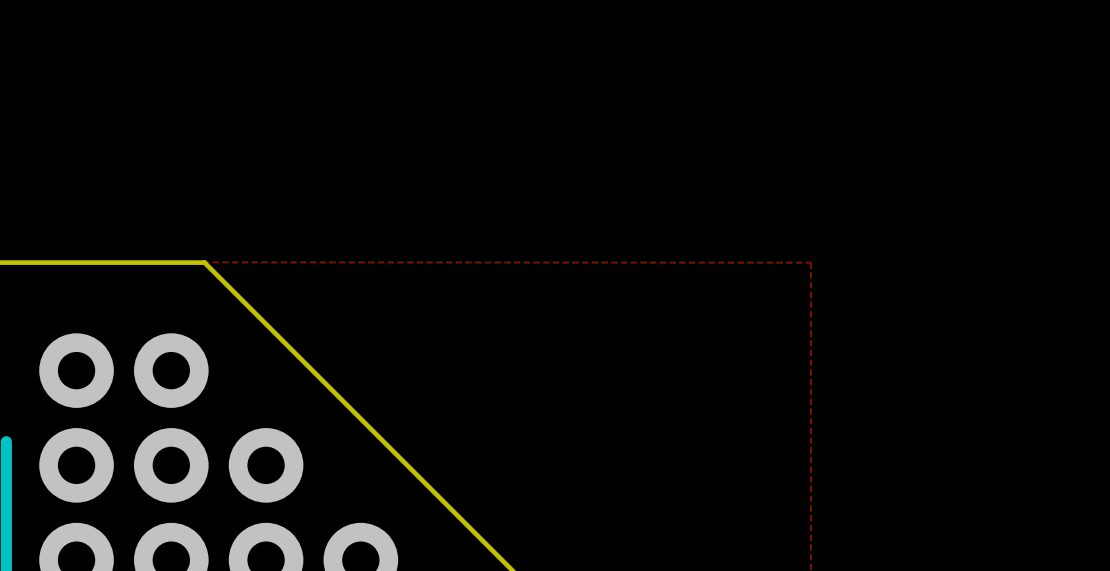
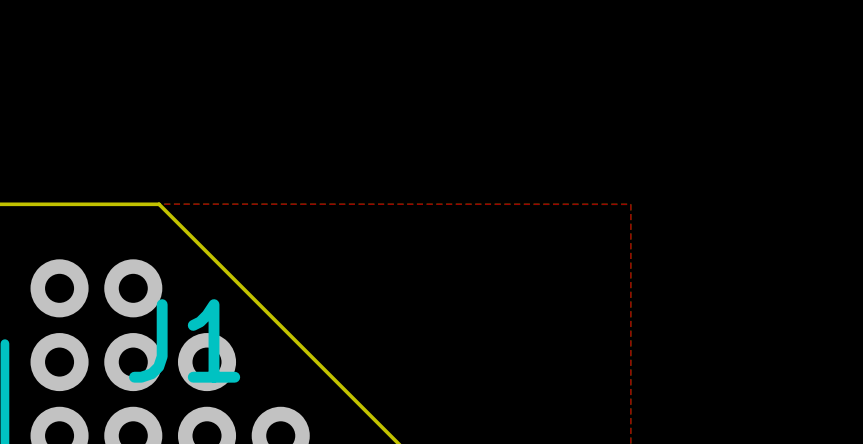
J1 name: none -> J1 (184, 340)

